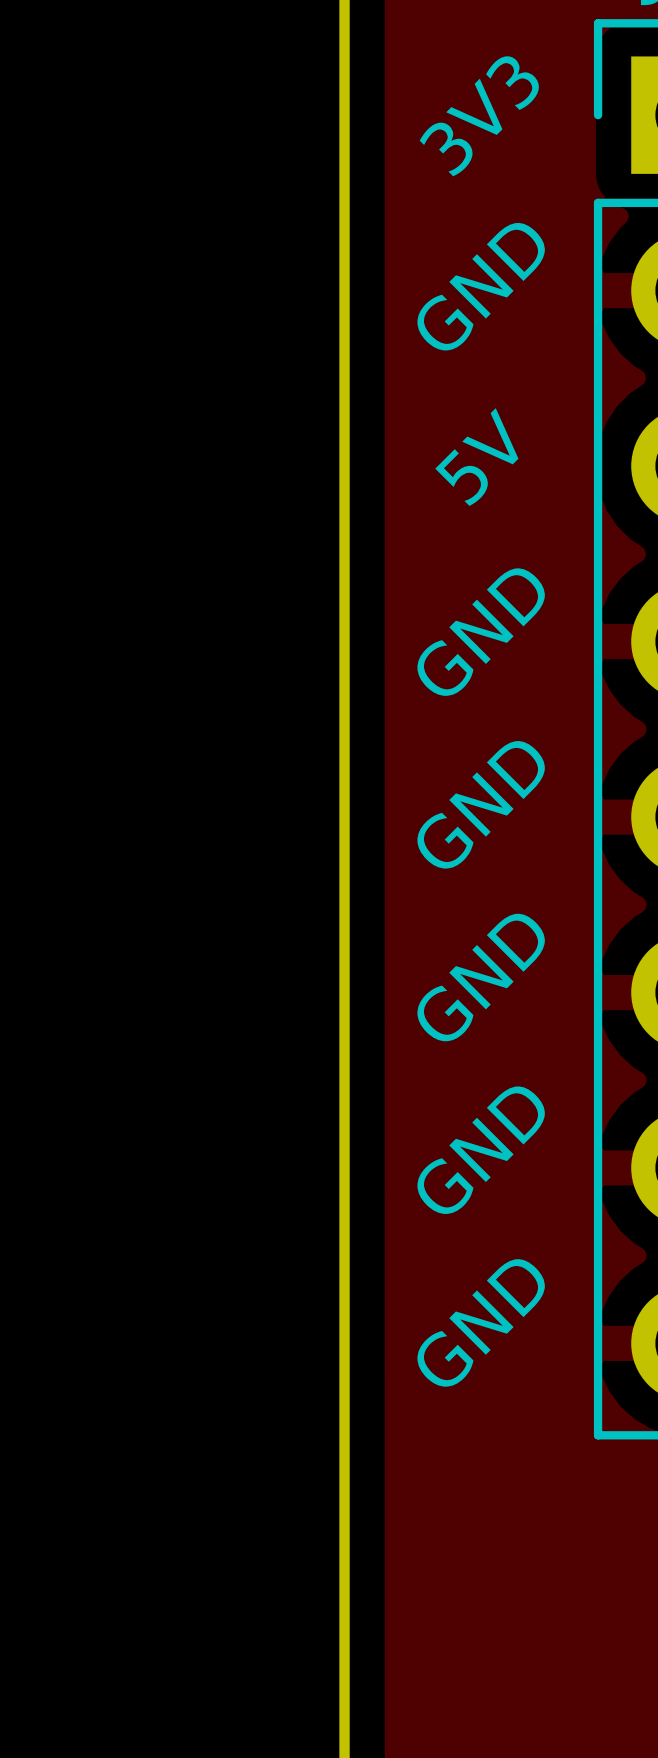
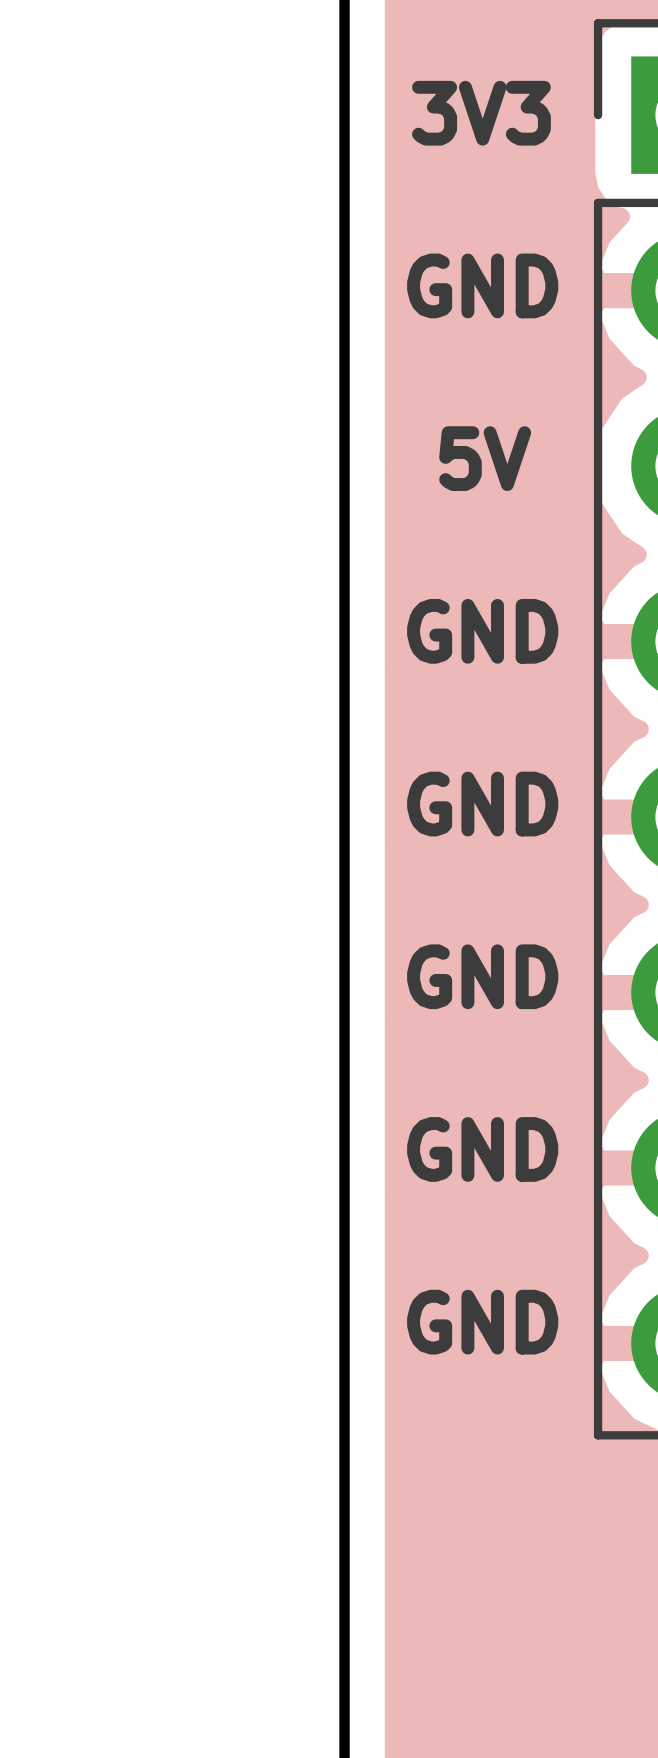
text rotation: 0° (479, 116) -> 45° clockwise (481, 113)
text rotation: 0° (481, 286) -> 45° clockwise (482, 285)
text rotation: 0° (476, 457) -> 45° clockwise (485, 458)
text rotation: 0° (481, 631) -> 45° clockwise (482, 631)
text rotation: 0° (481, 804) -> 45° clockwise (482, 804)
text rotation: 0° (481, 977) -> 45° clockwise (482, 976)
text rotation: 0° (481, 1150) -> 45° clockwise (482, 1149)
text rotation: 0° (481, 1322) -> 45° clockwise (482, 1322)

